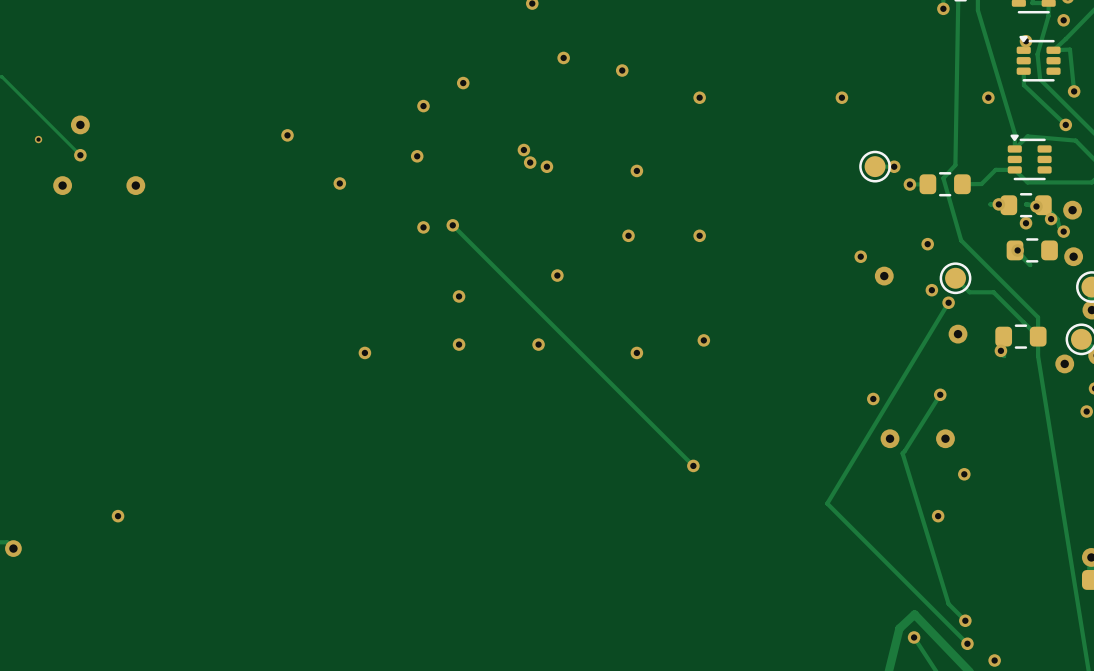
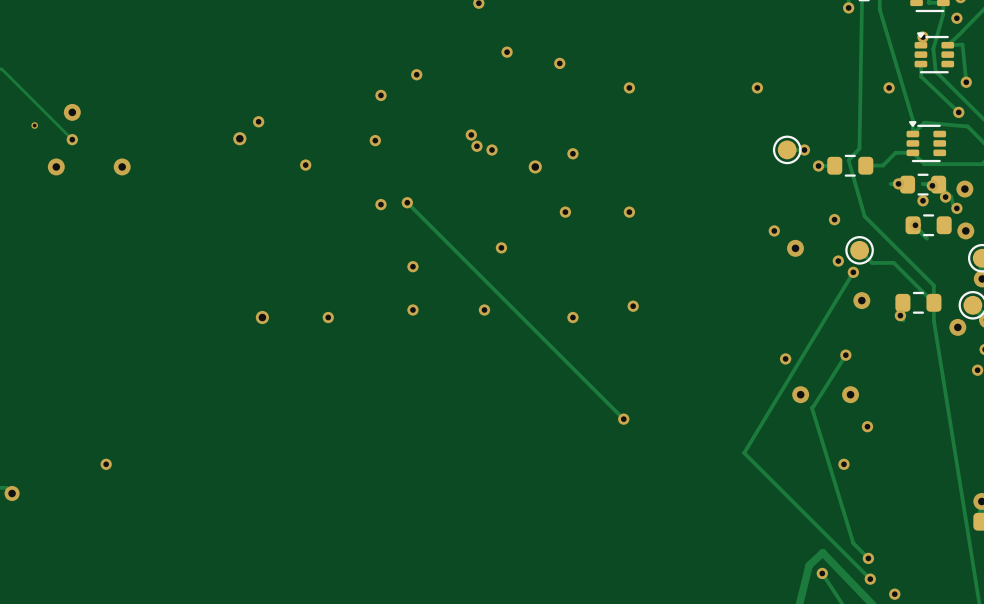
via: none -> (239, 138)
via: none -> (535, 166)
via: none -> (262, 317)

